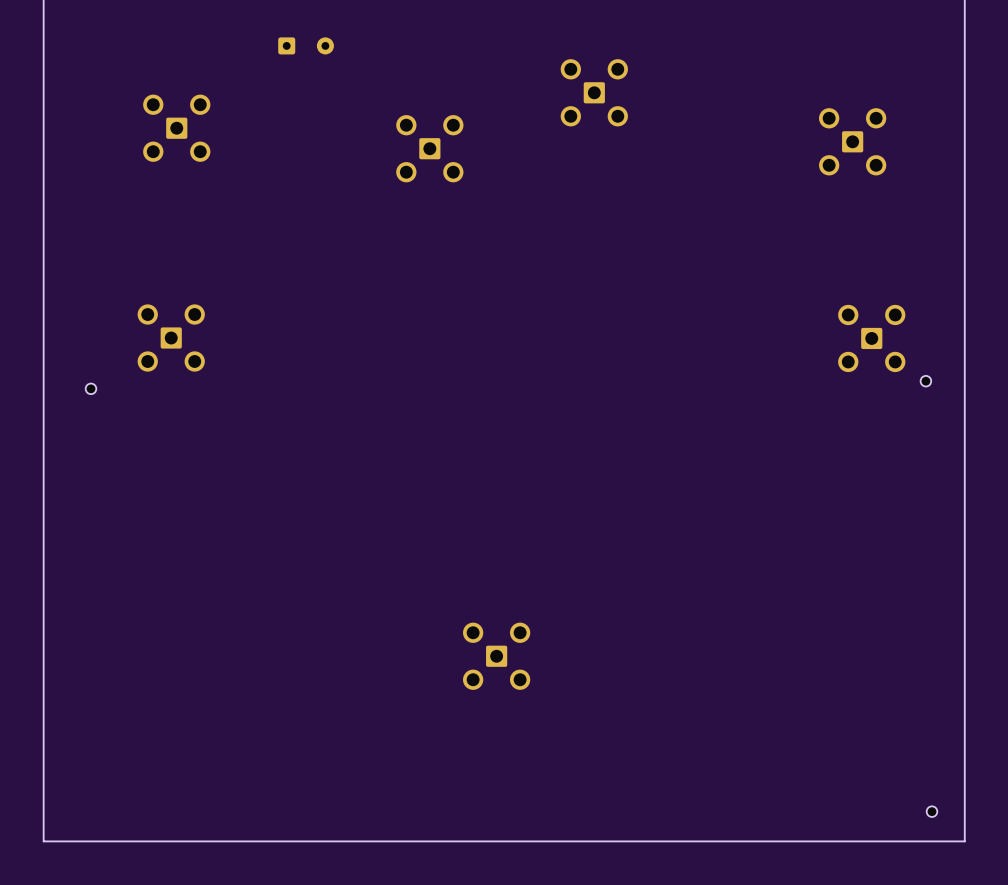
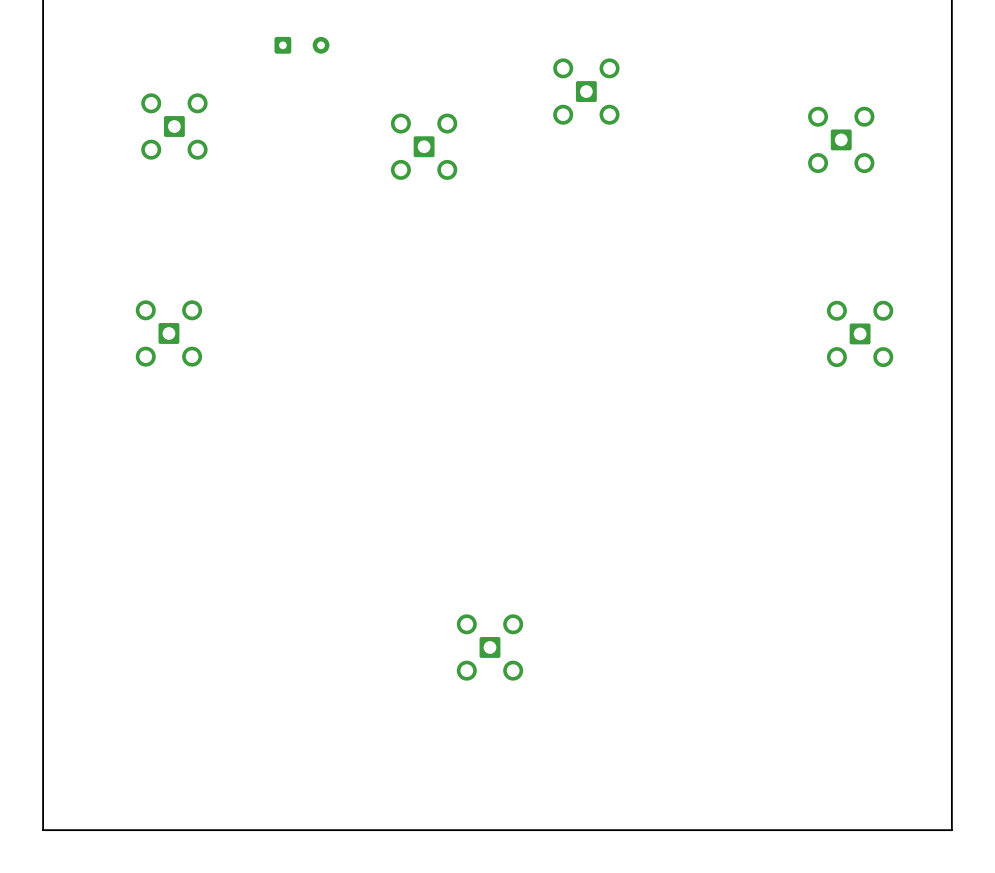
part: (925, 381) -> none
part: (91, 388) -> none
part: (932, 811) -> none

